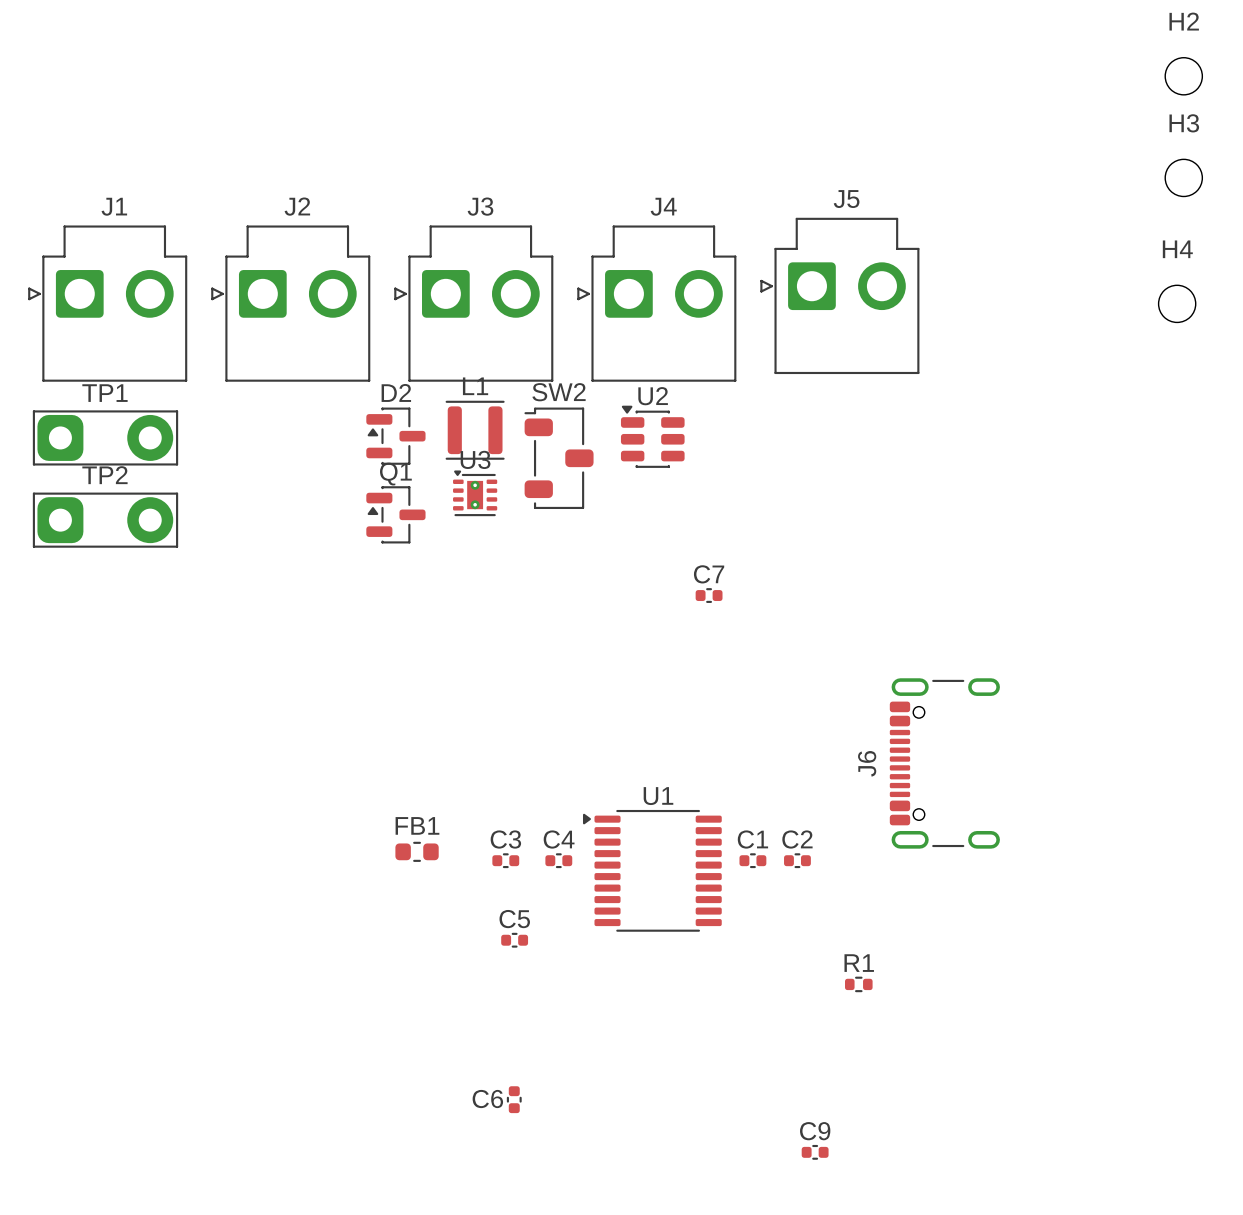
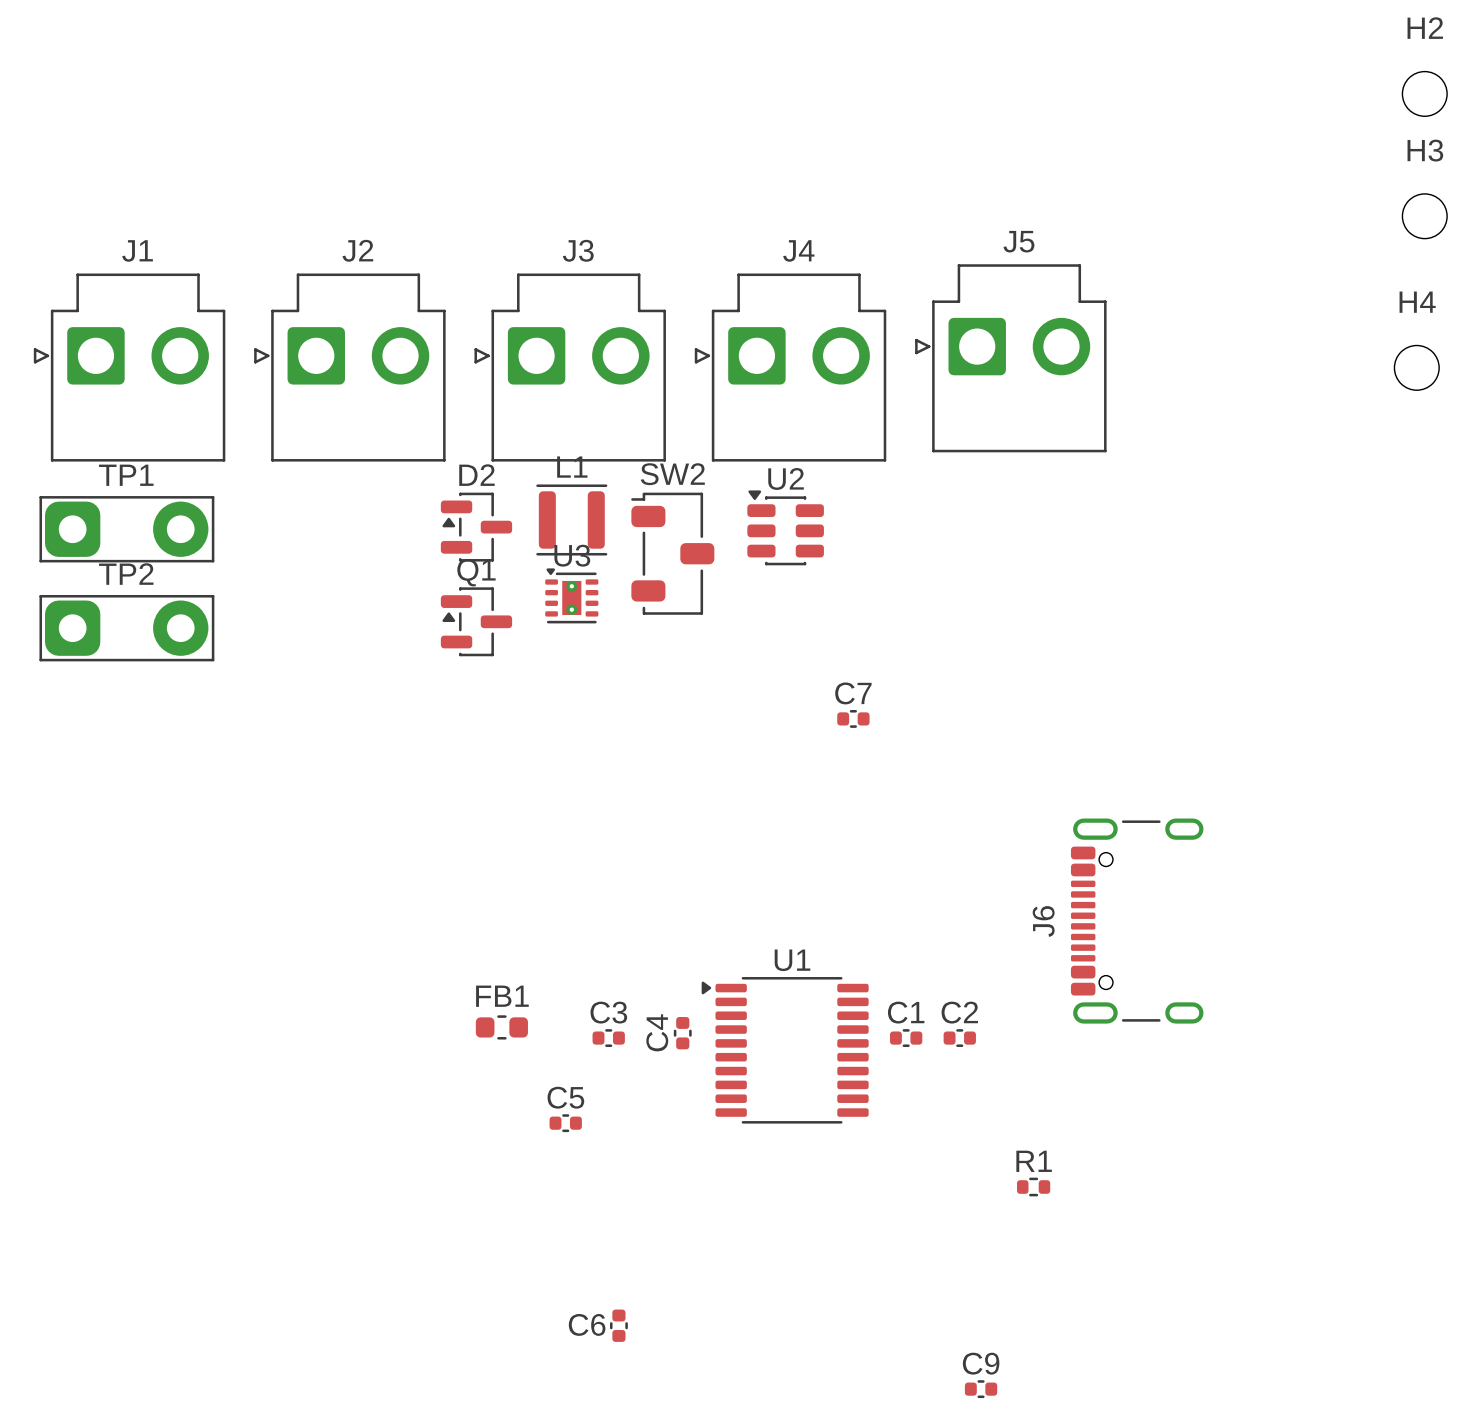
C4 rotation: 0° (558, 860) -> 90° clockwise (682, 1033)
C5 position: (514, 940) -> (565, 1123)

